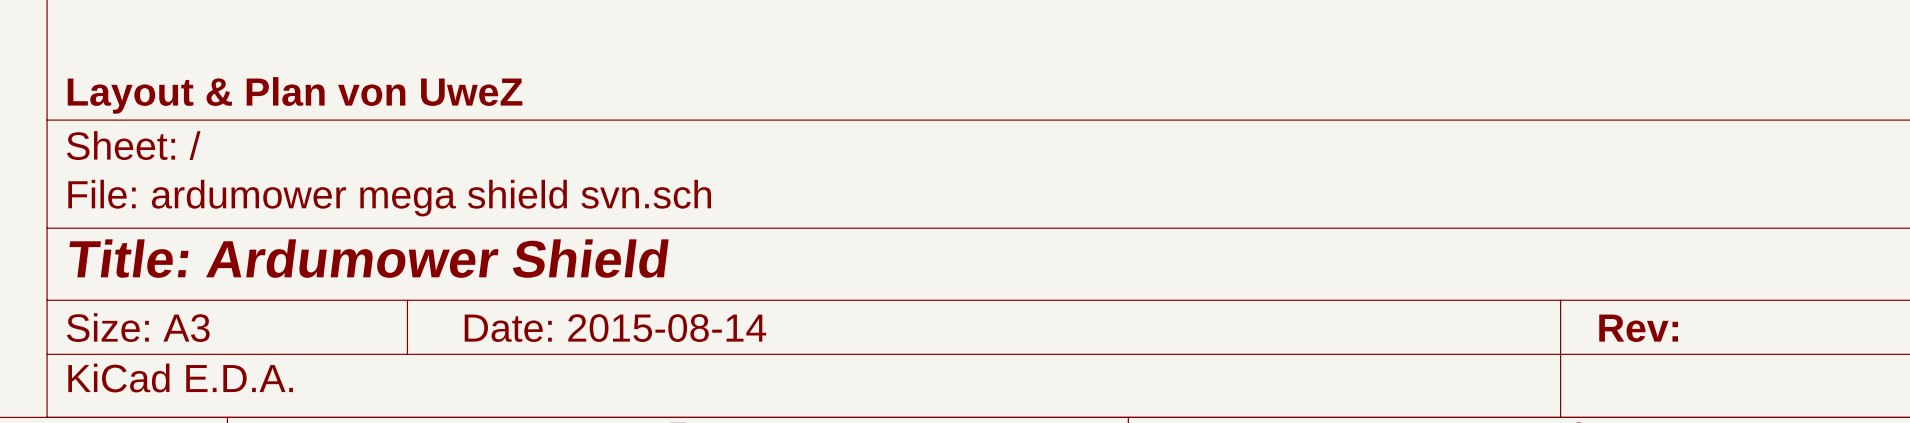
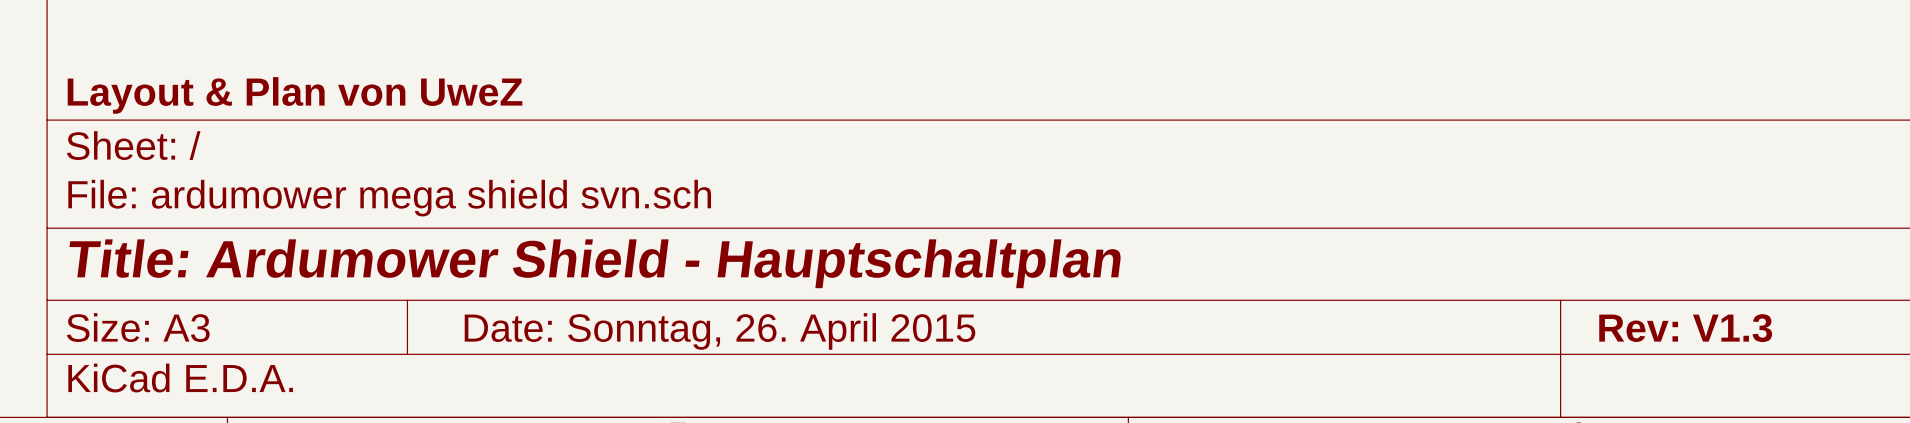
title block: Title: Ardumower Shield (369, 258) -> Title: Ardumower Shield - Hauptschaltplan (595, 263)
title block: Date: 2015-08-14 (615, 328) -> Date: Sonntag, 26. April 2015 (719, 331)
title block: Rev: (1638, 328) -> Rev: V1.3 (1685, 328)

